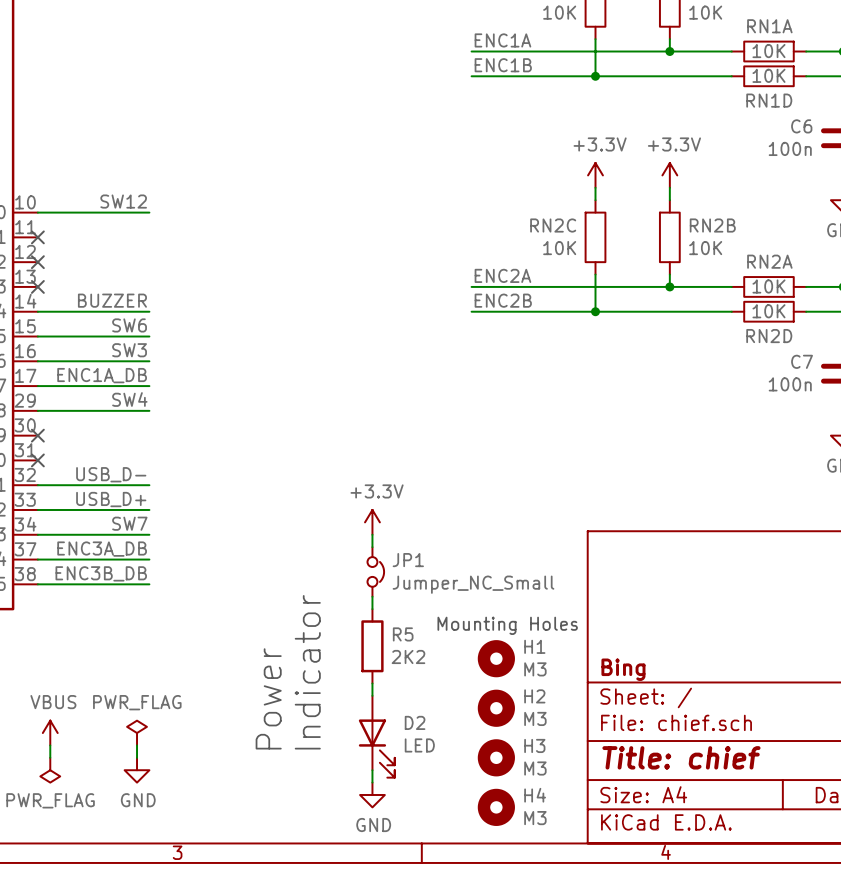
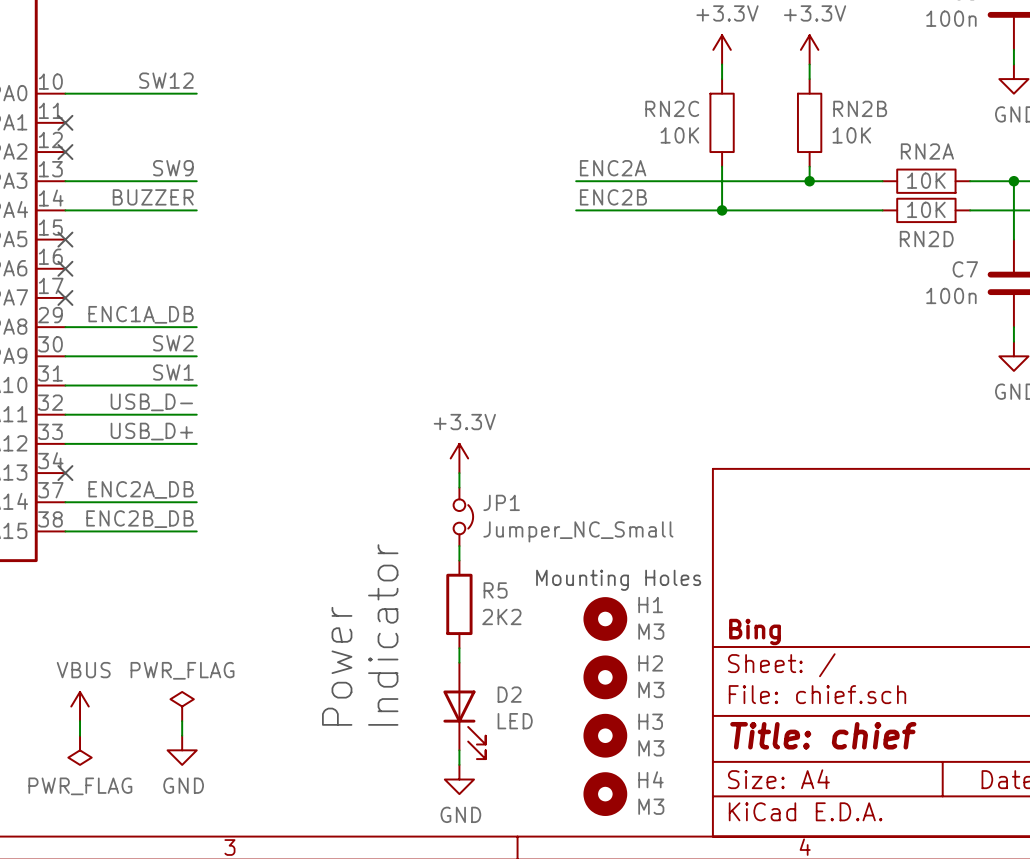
label: none -> SW9 (173, 168)
no-connect mark: (37, 286) -> none
label: SW6 (129, 325) -> none
wire: (37, 336) (149, 336) -> (65, 356) (196, 356)
no-connect mark: none -> (65, 239)
label: SW3 (129, 350) -> none
wire: (37, 361) (149, 361) -> (65, 181) (196, 181)
no-connect mark: none -> (65, 268)
label: ENC1A_DB (102, 375) -> none
wire: (37, 386) (149, 386) -> (65, 385) (196, 385)
no-connect mark: none -> (65, 297)
label: SW4 (129, 399) -> ENC1A_DB (141, 314)
label: none -> SW2 (173, 343)
no-connect mark: (37, 435) -> none
label: none -> SW1 (173, 372)
no-connect mark: (37, 460) -> none
label: SW7 (129, 523) -> none
wire: (37, 534) (149, 534) -> none
no-connect mark: none -> (65, 473)
label: ENC3A_DB (102, 549) -> ENC2A_DB (141, 489)
label: ENC3B_DB (101, 573) -> ENC2B_DB (140, 519)

